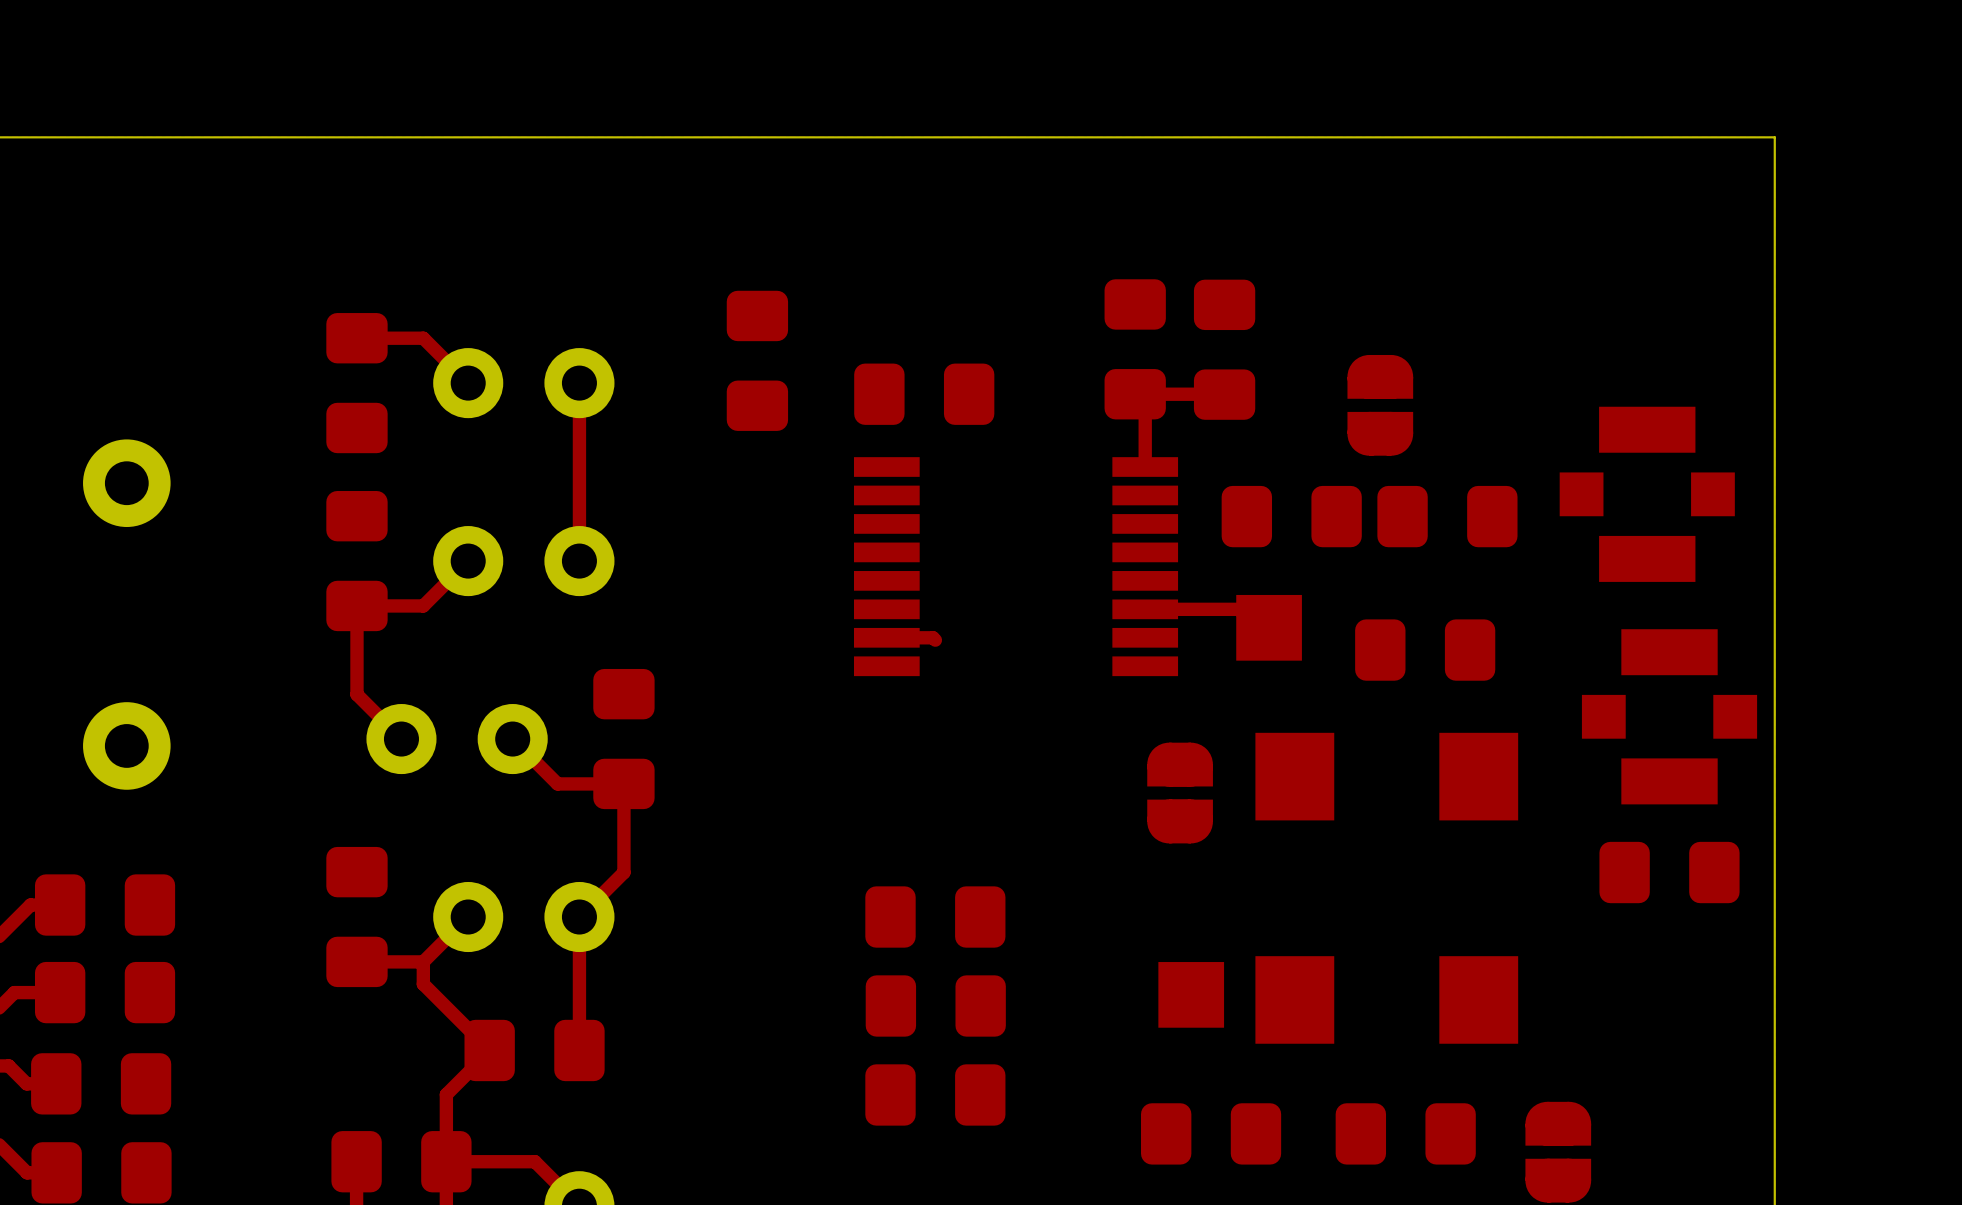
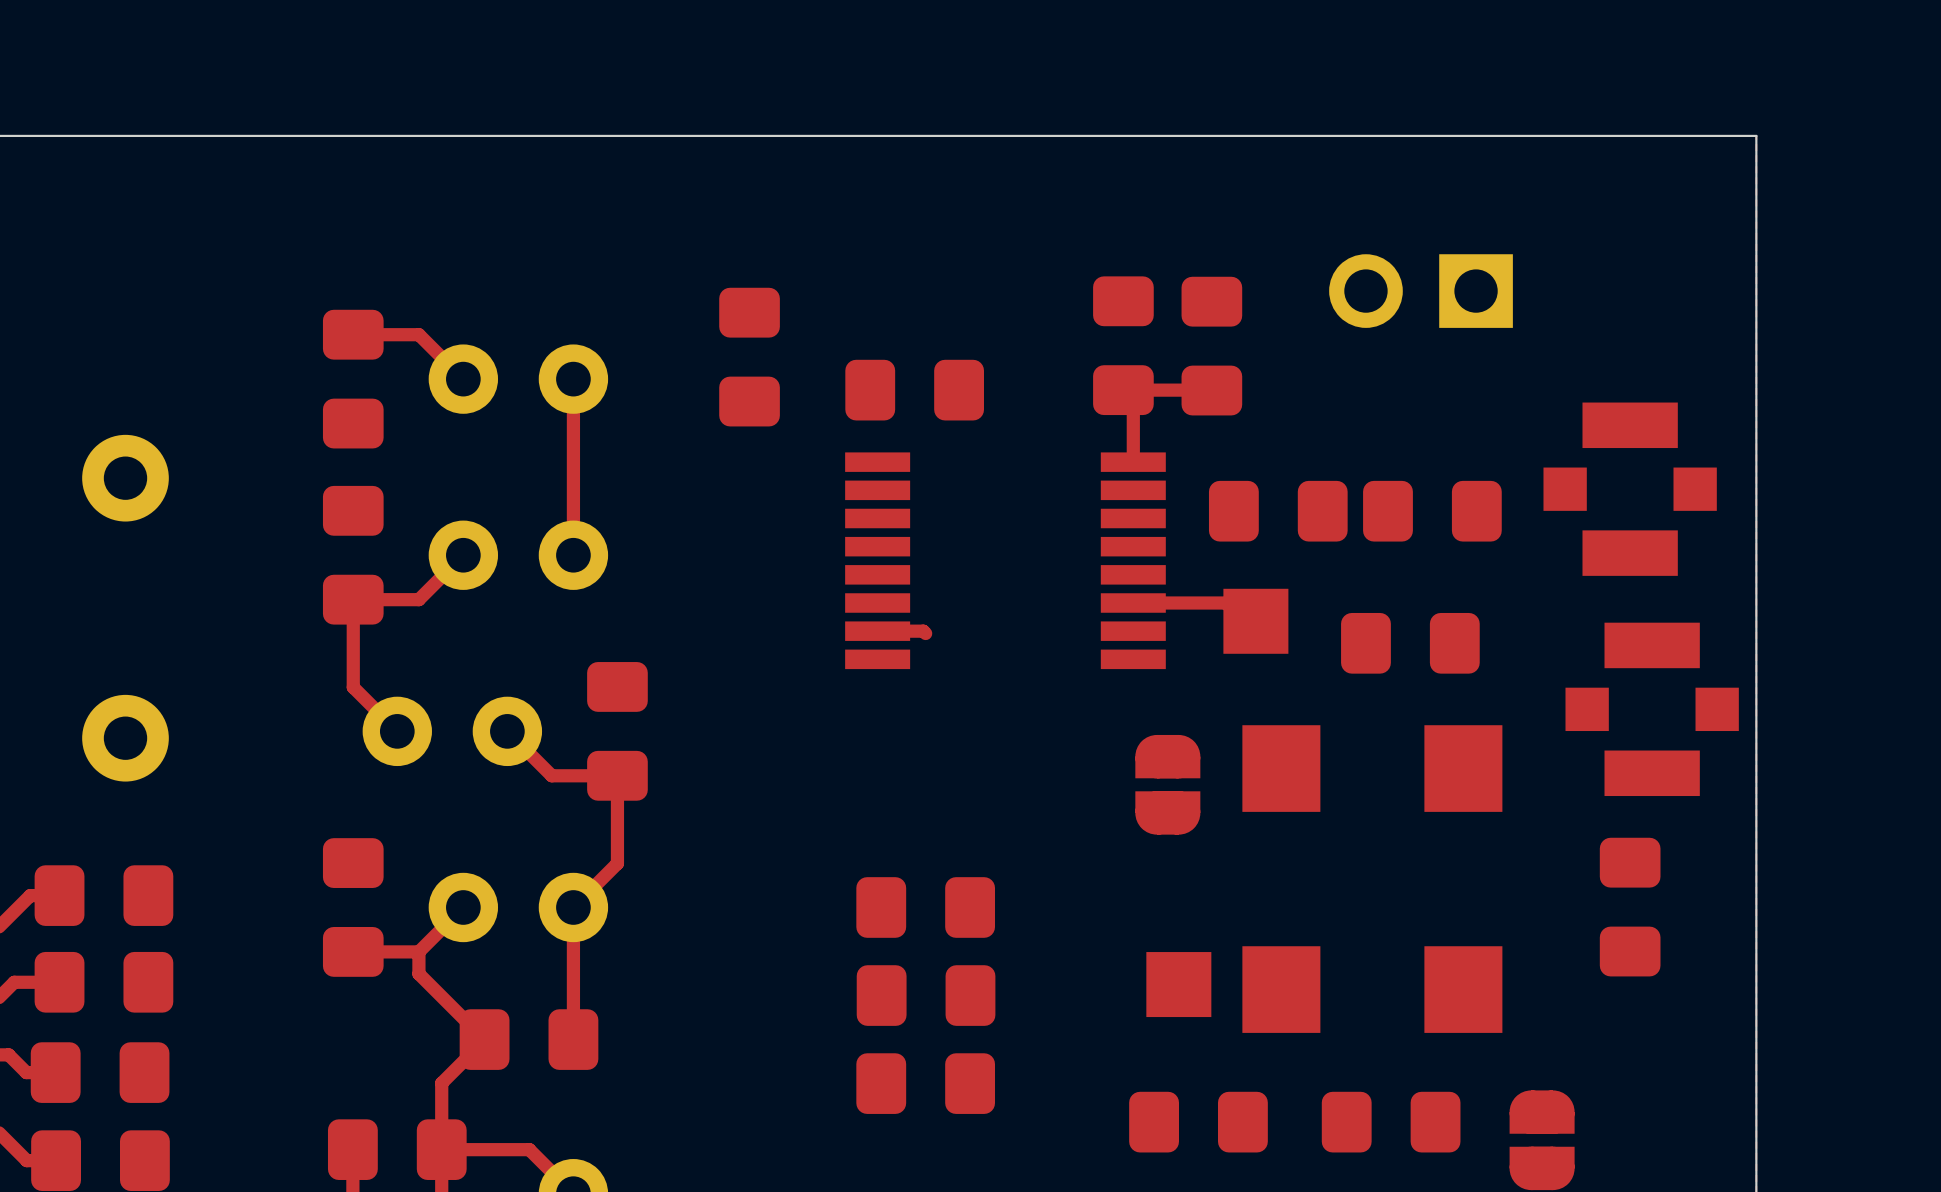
part: none -> (1421, 291)
part: (1380, 405) -> none
part rotation: 0° (1669, 872) -> 90° clockwise (1630, 907)

